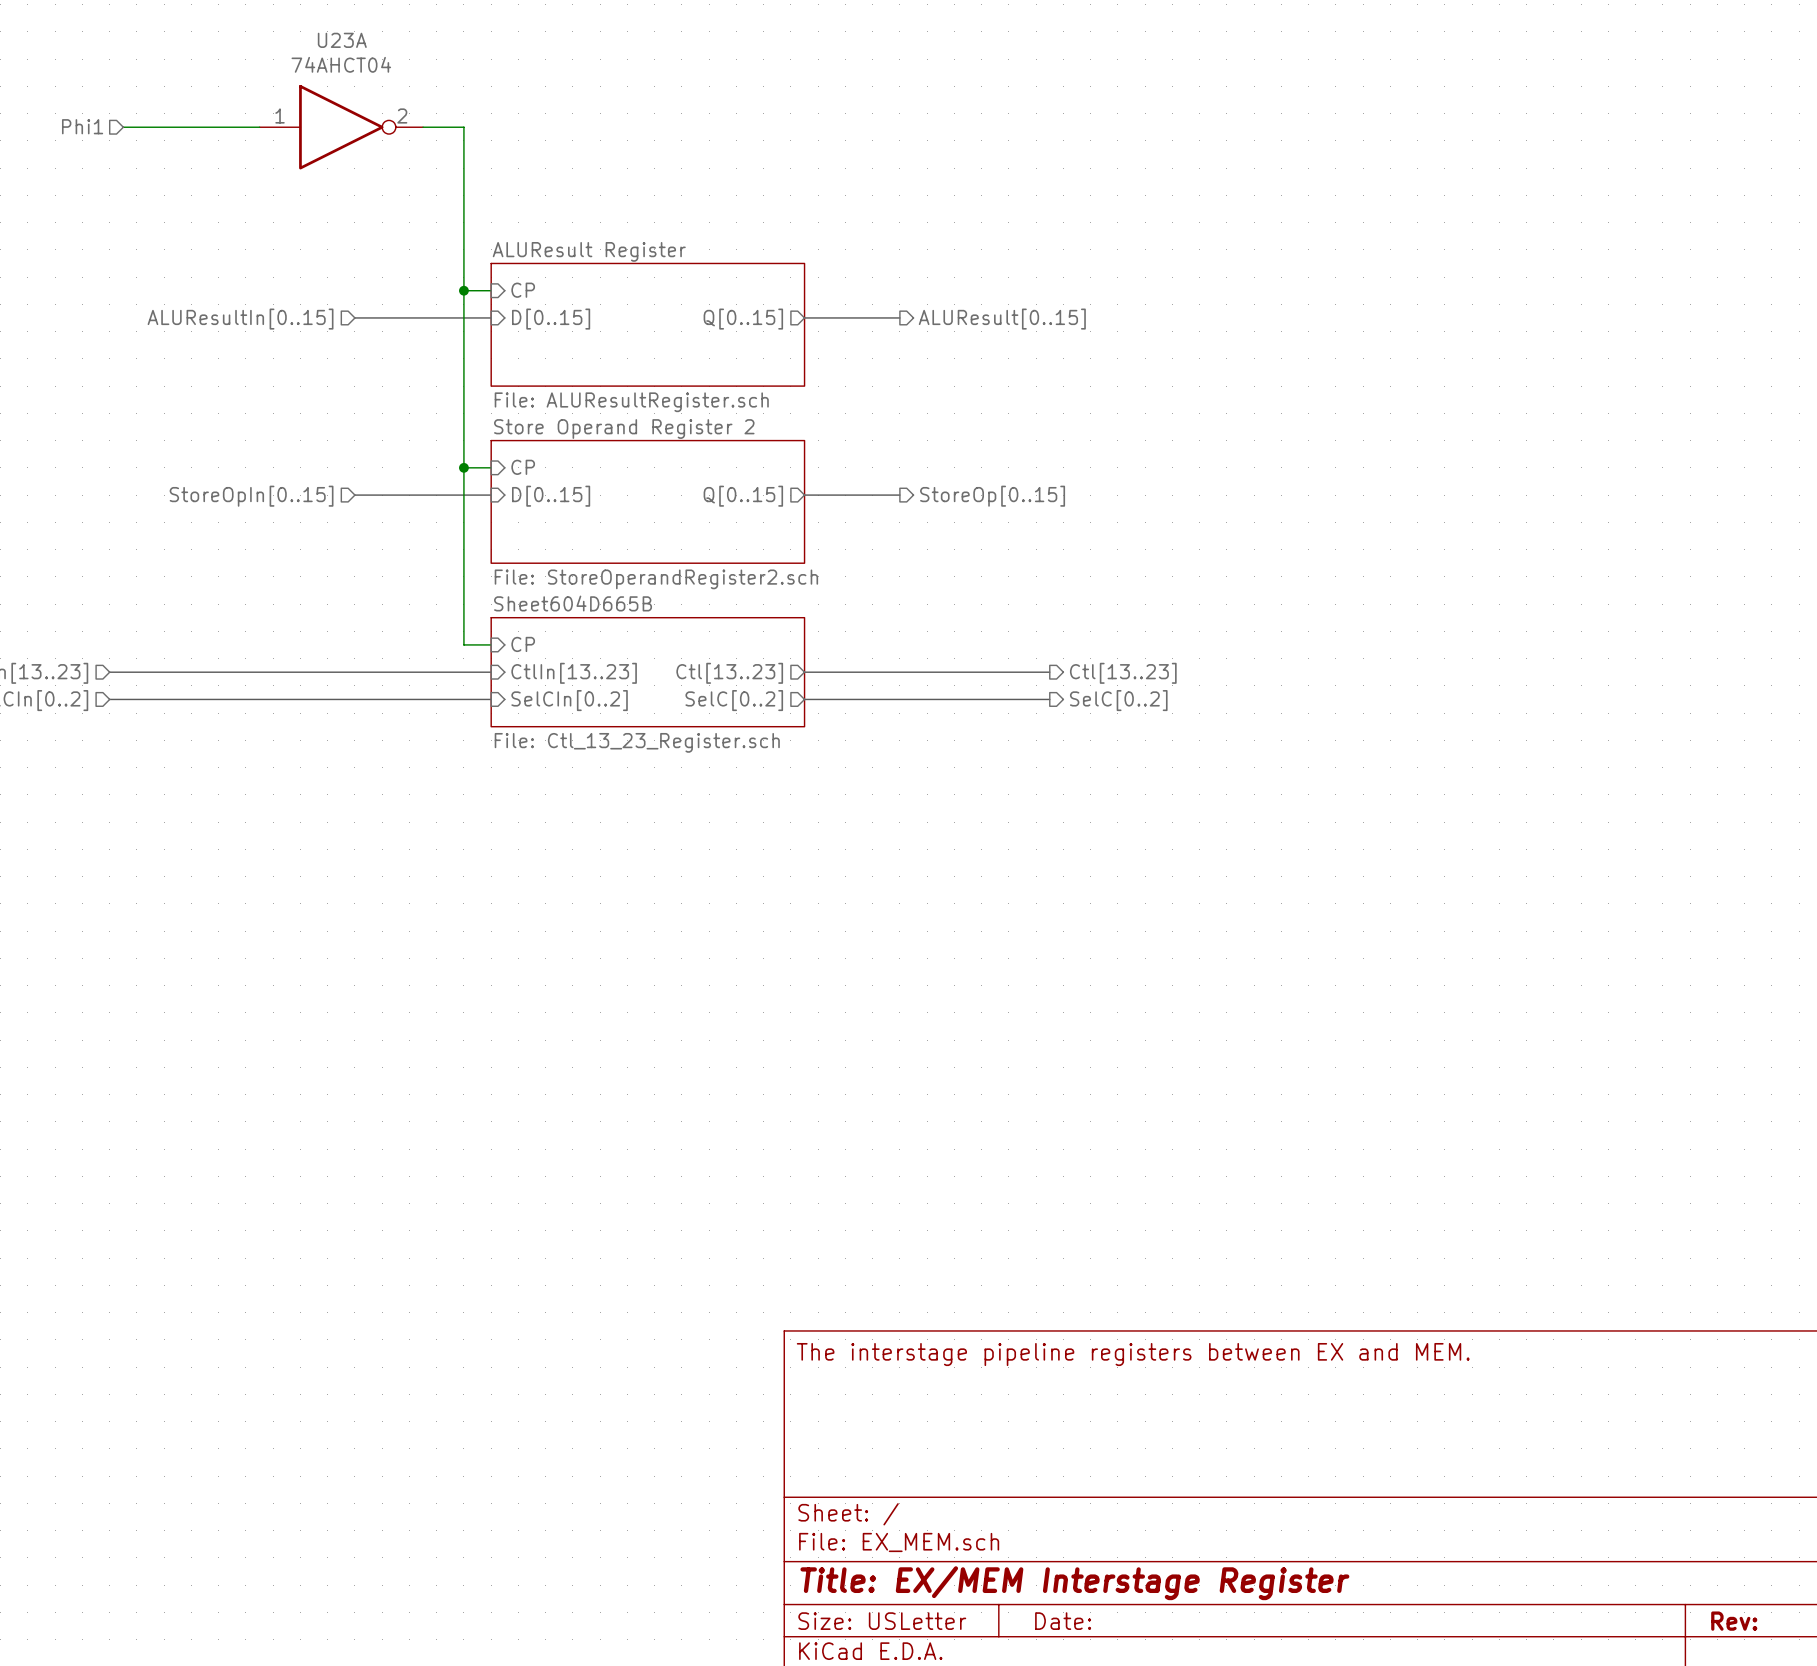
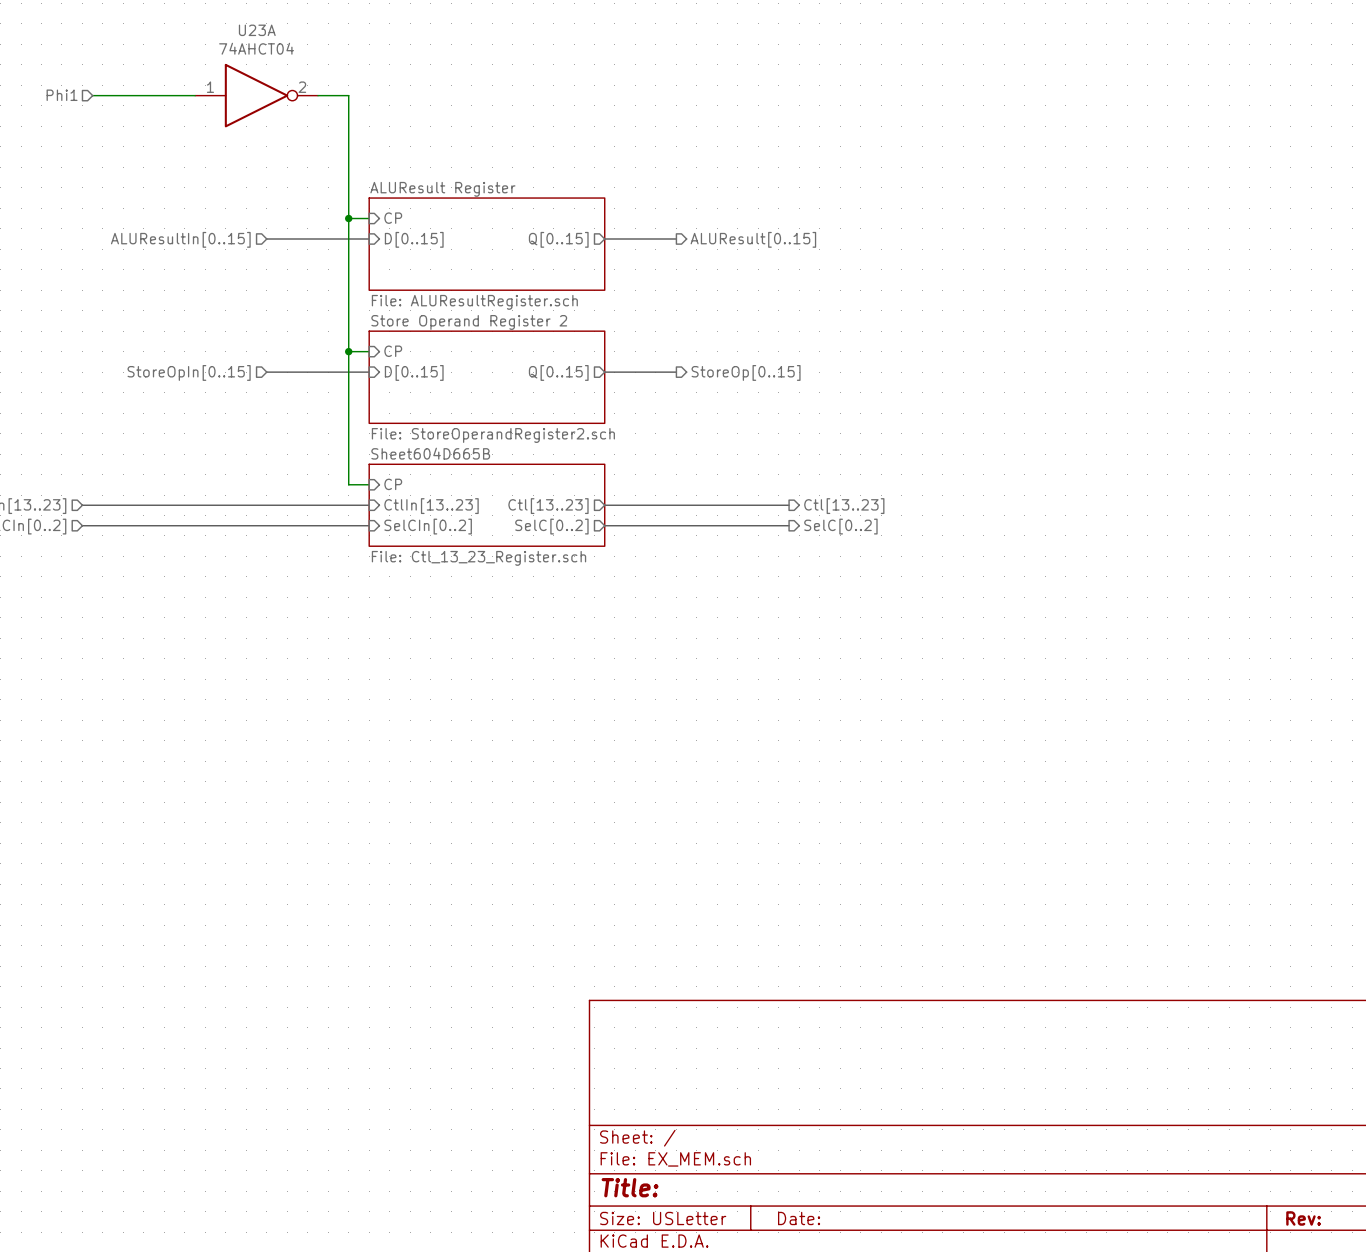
title block: The interstage pipeline registers between EX and MEM. (1133, 1354) -> none
title block: Title: EX/MEM Interstage Register (1074, 1583) -> Title: (630, 1187)

